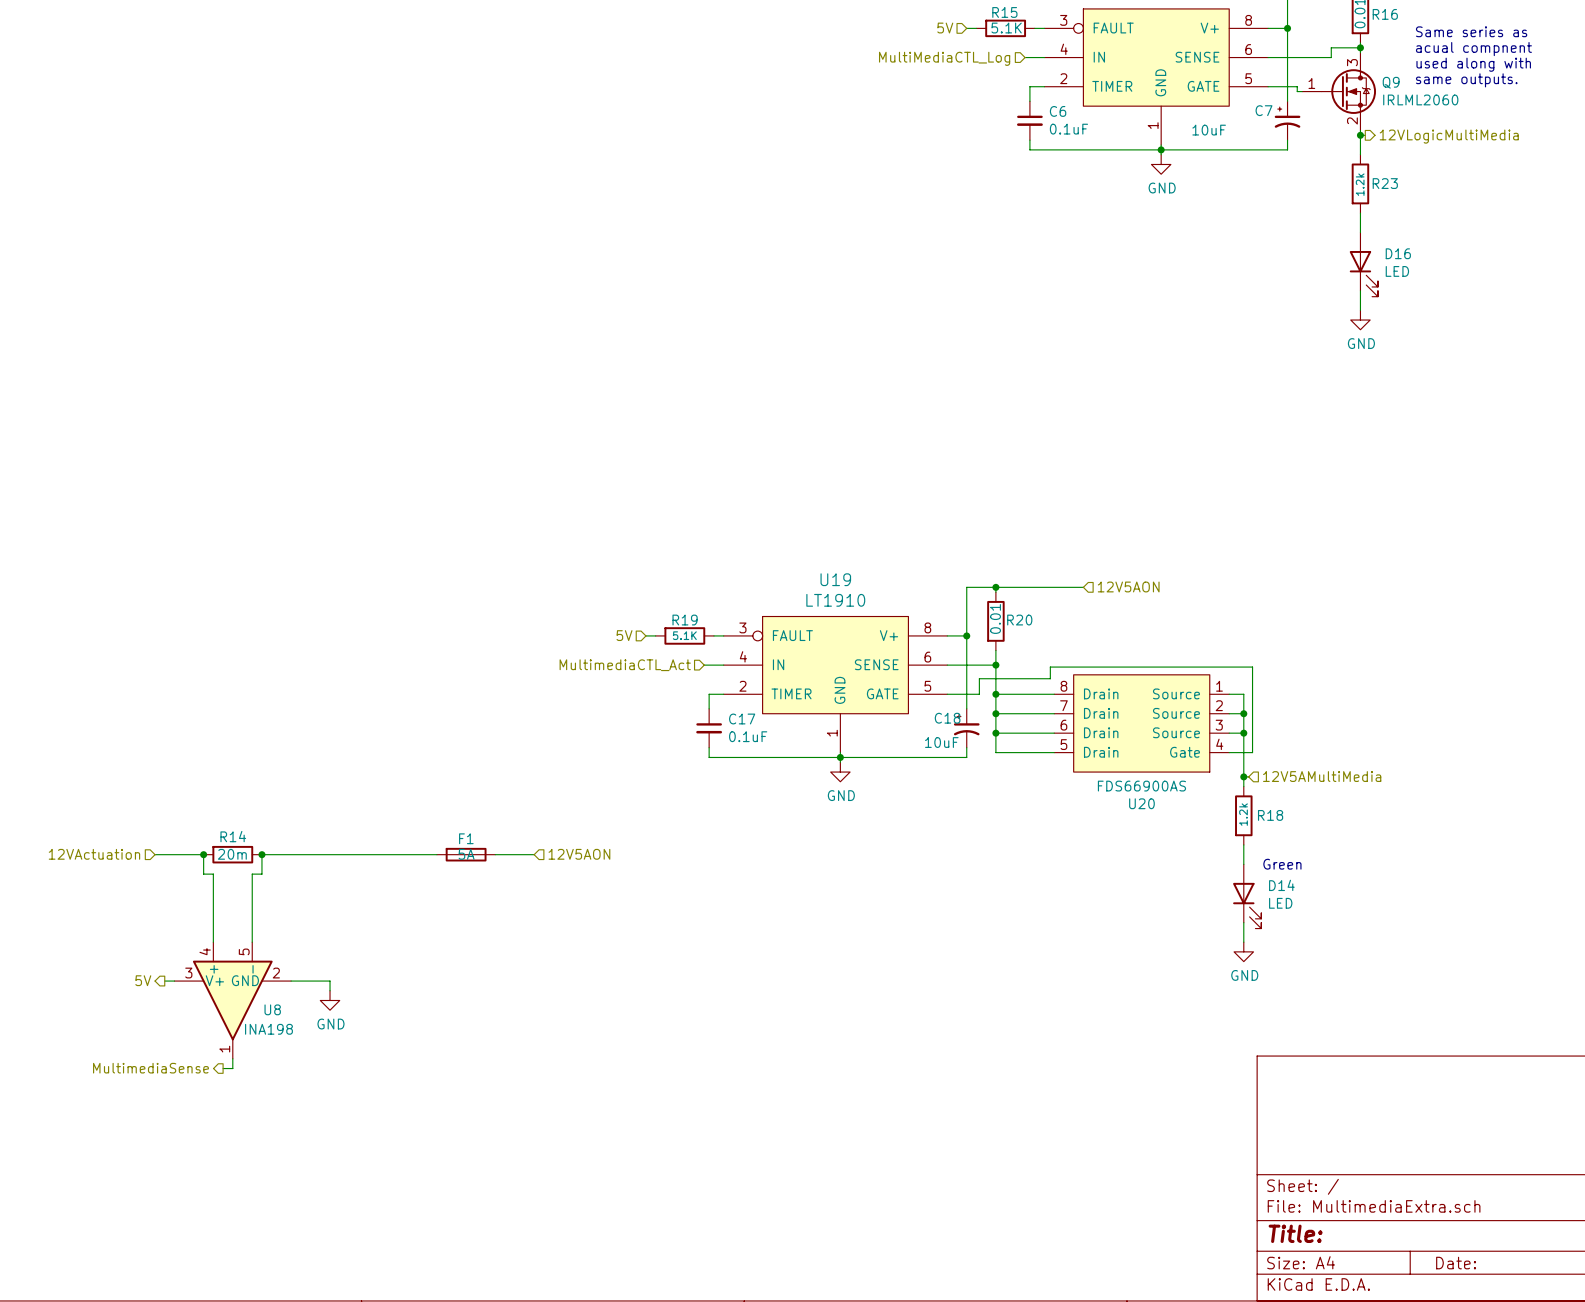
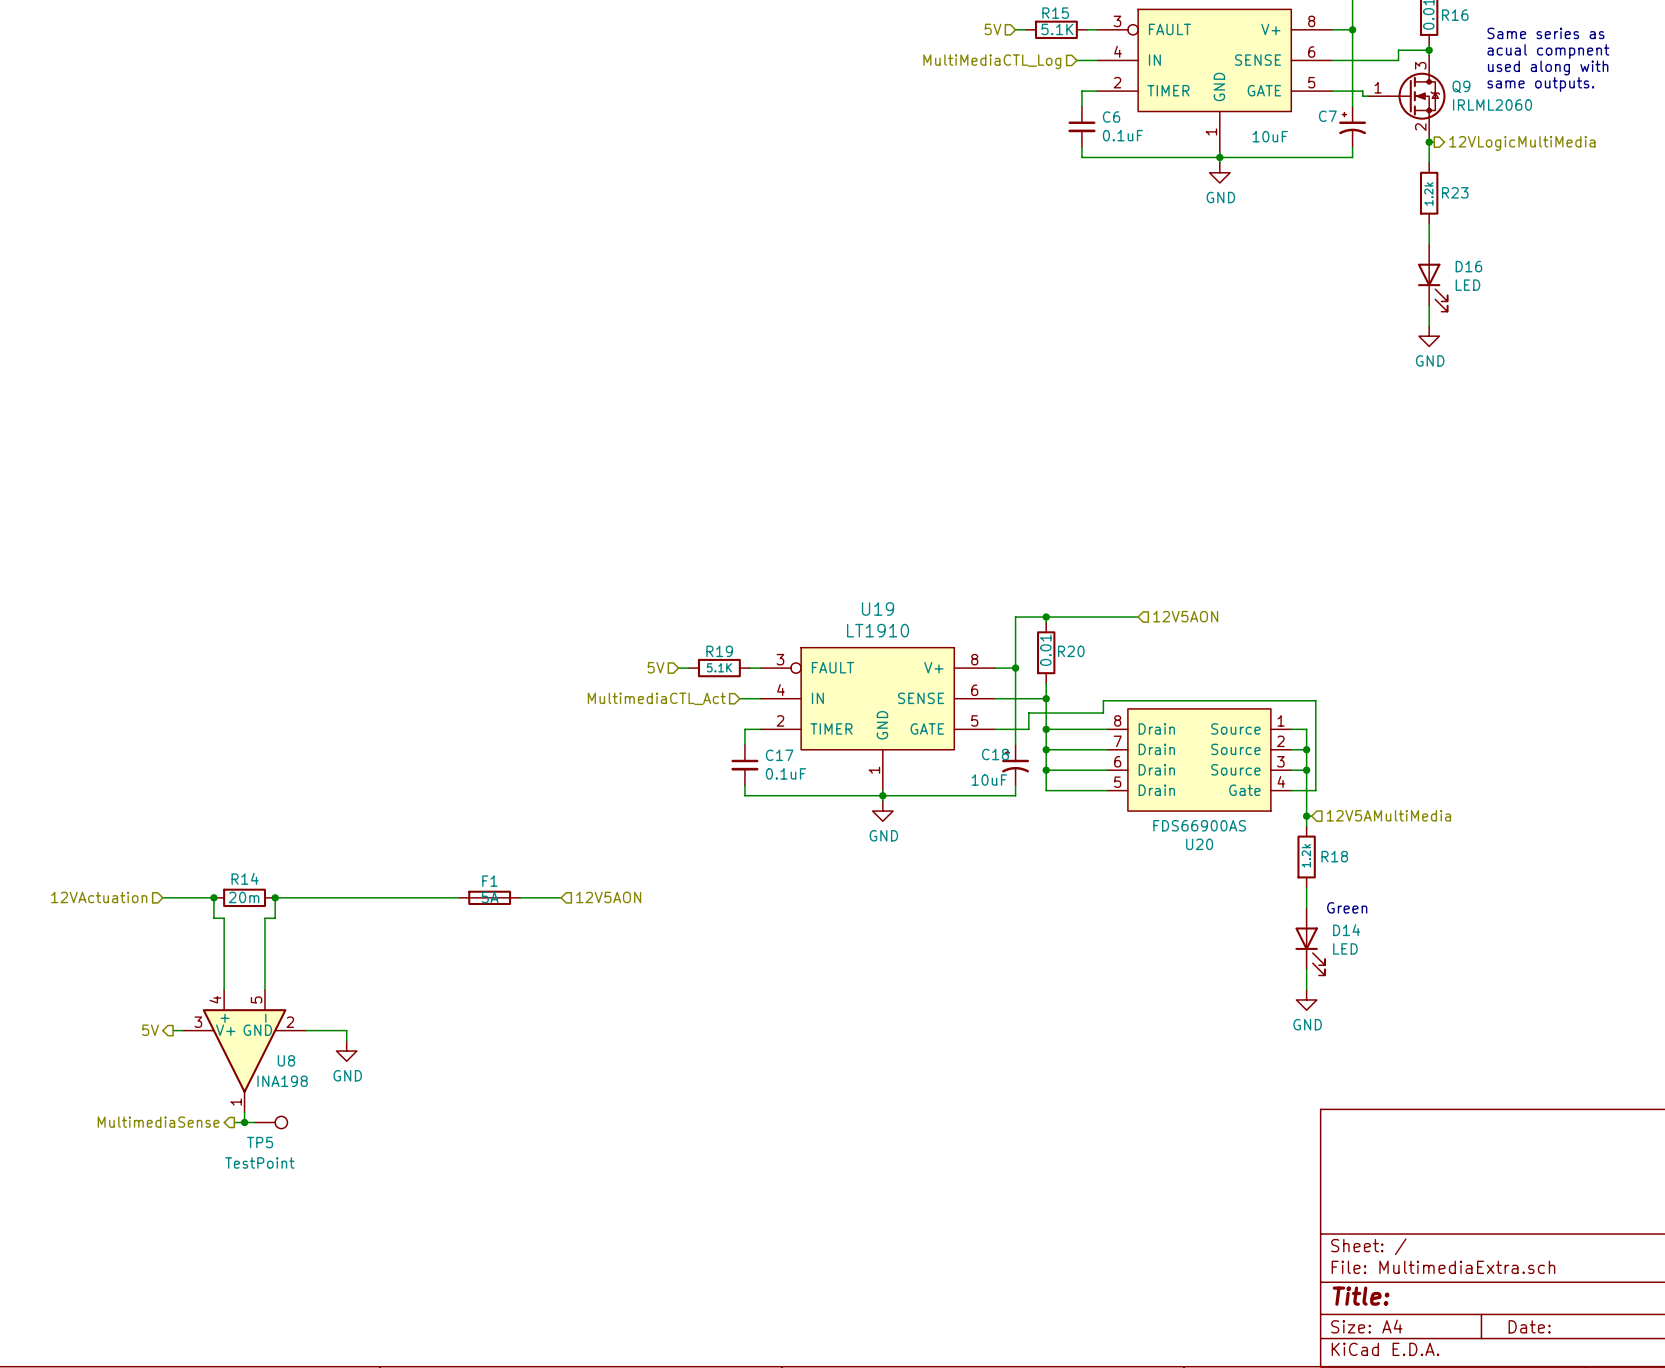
wire: none -> (244, 1122) (254, 1122)
junction: none -> (244, 1122)
TP5: none -> TestPoint (271, 1122)

